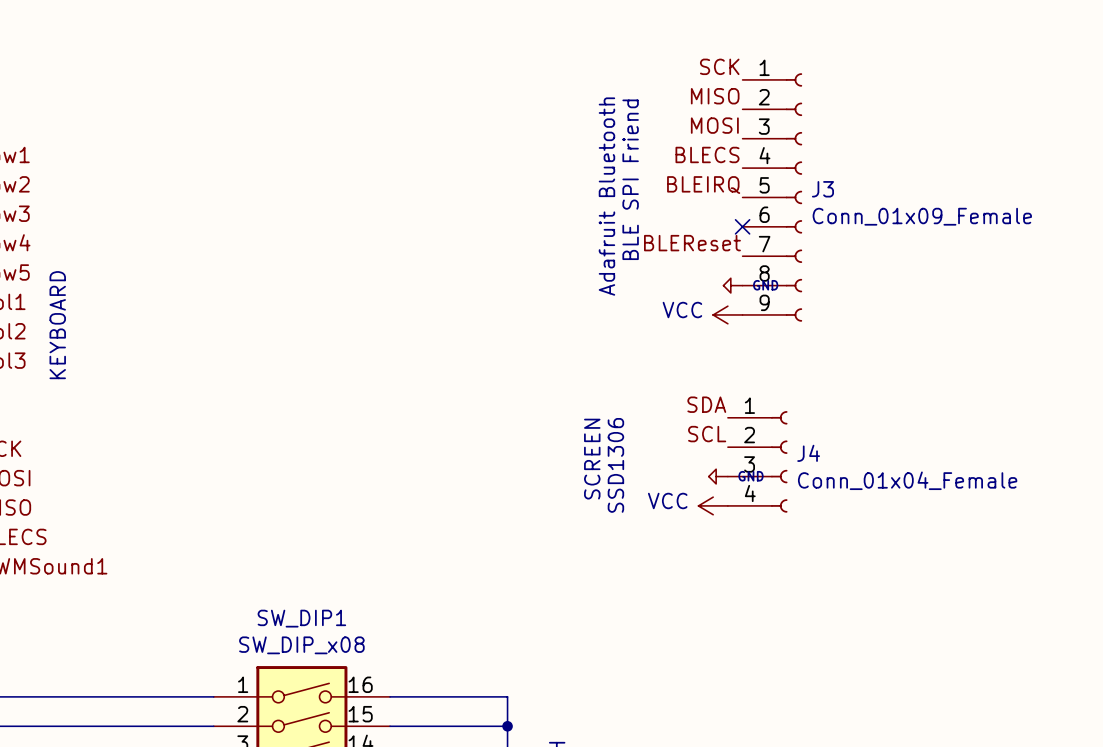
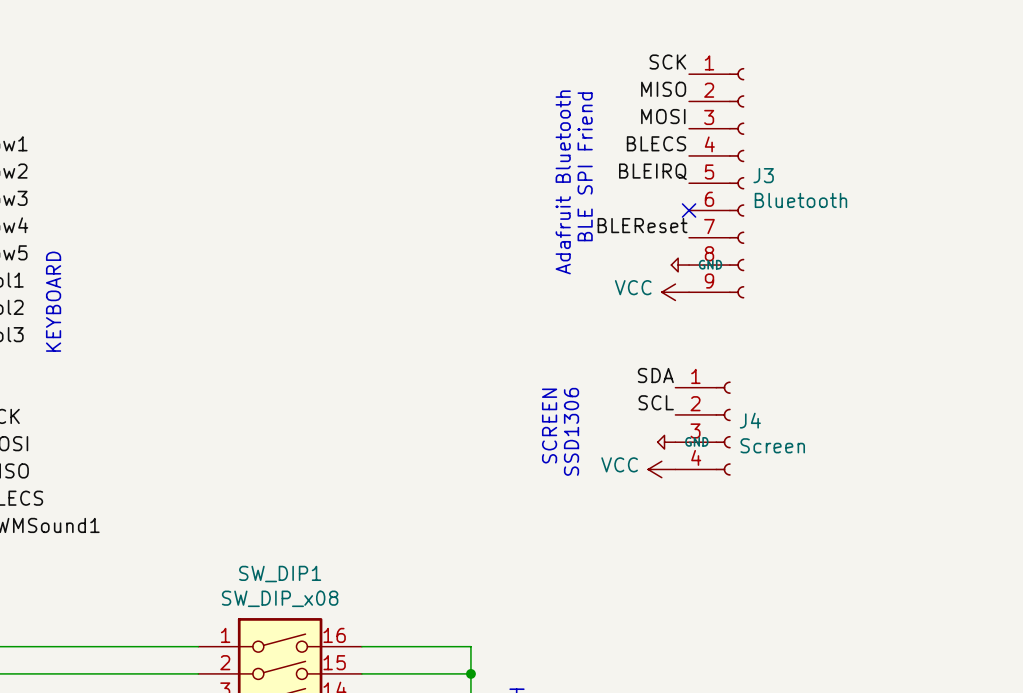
J3 value: Conn_01x09_Female (922, 216) -> Bluetooth (800, 200)
J4 value: Conn_01x04_Female (907, 480) -> Screen (772, 445)

